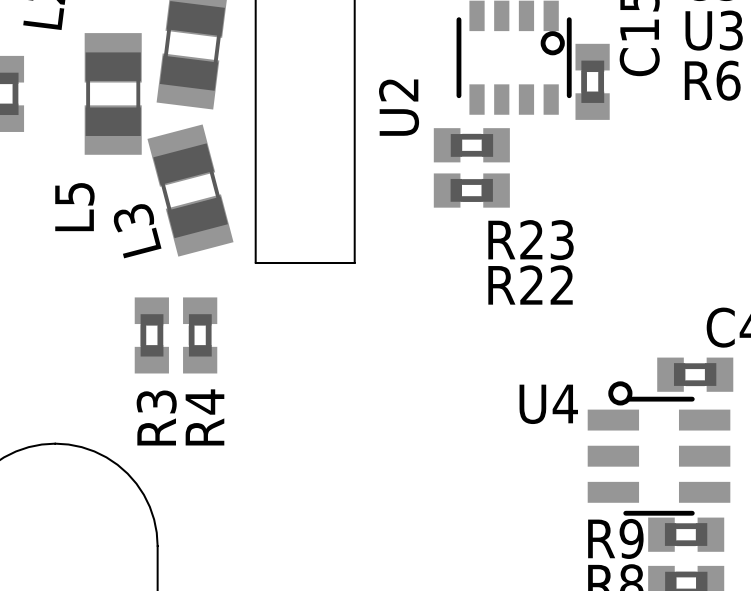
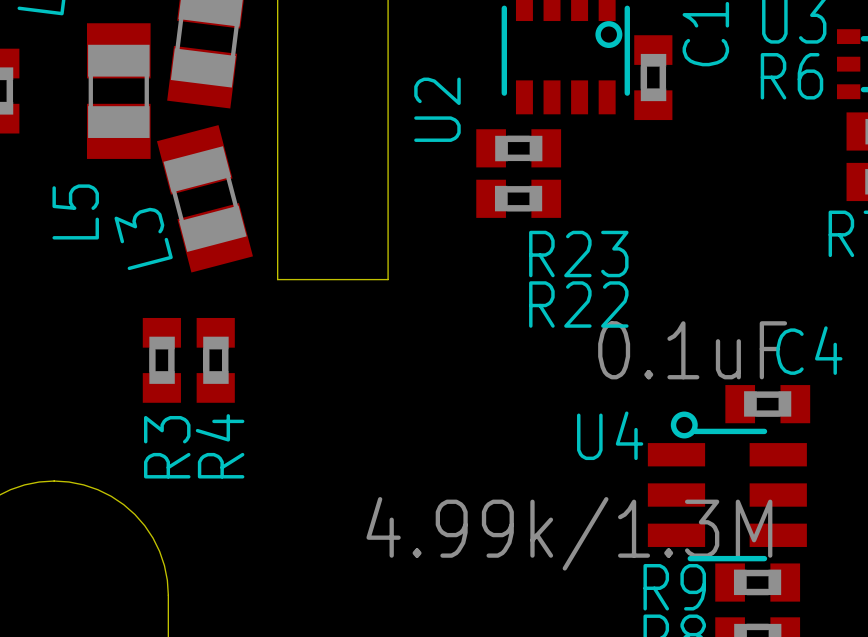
C4 value: none -> 0.1uF (692, 350)
R9 value: none -> 4.99k/1.3M (569, 533)

